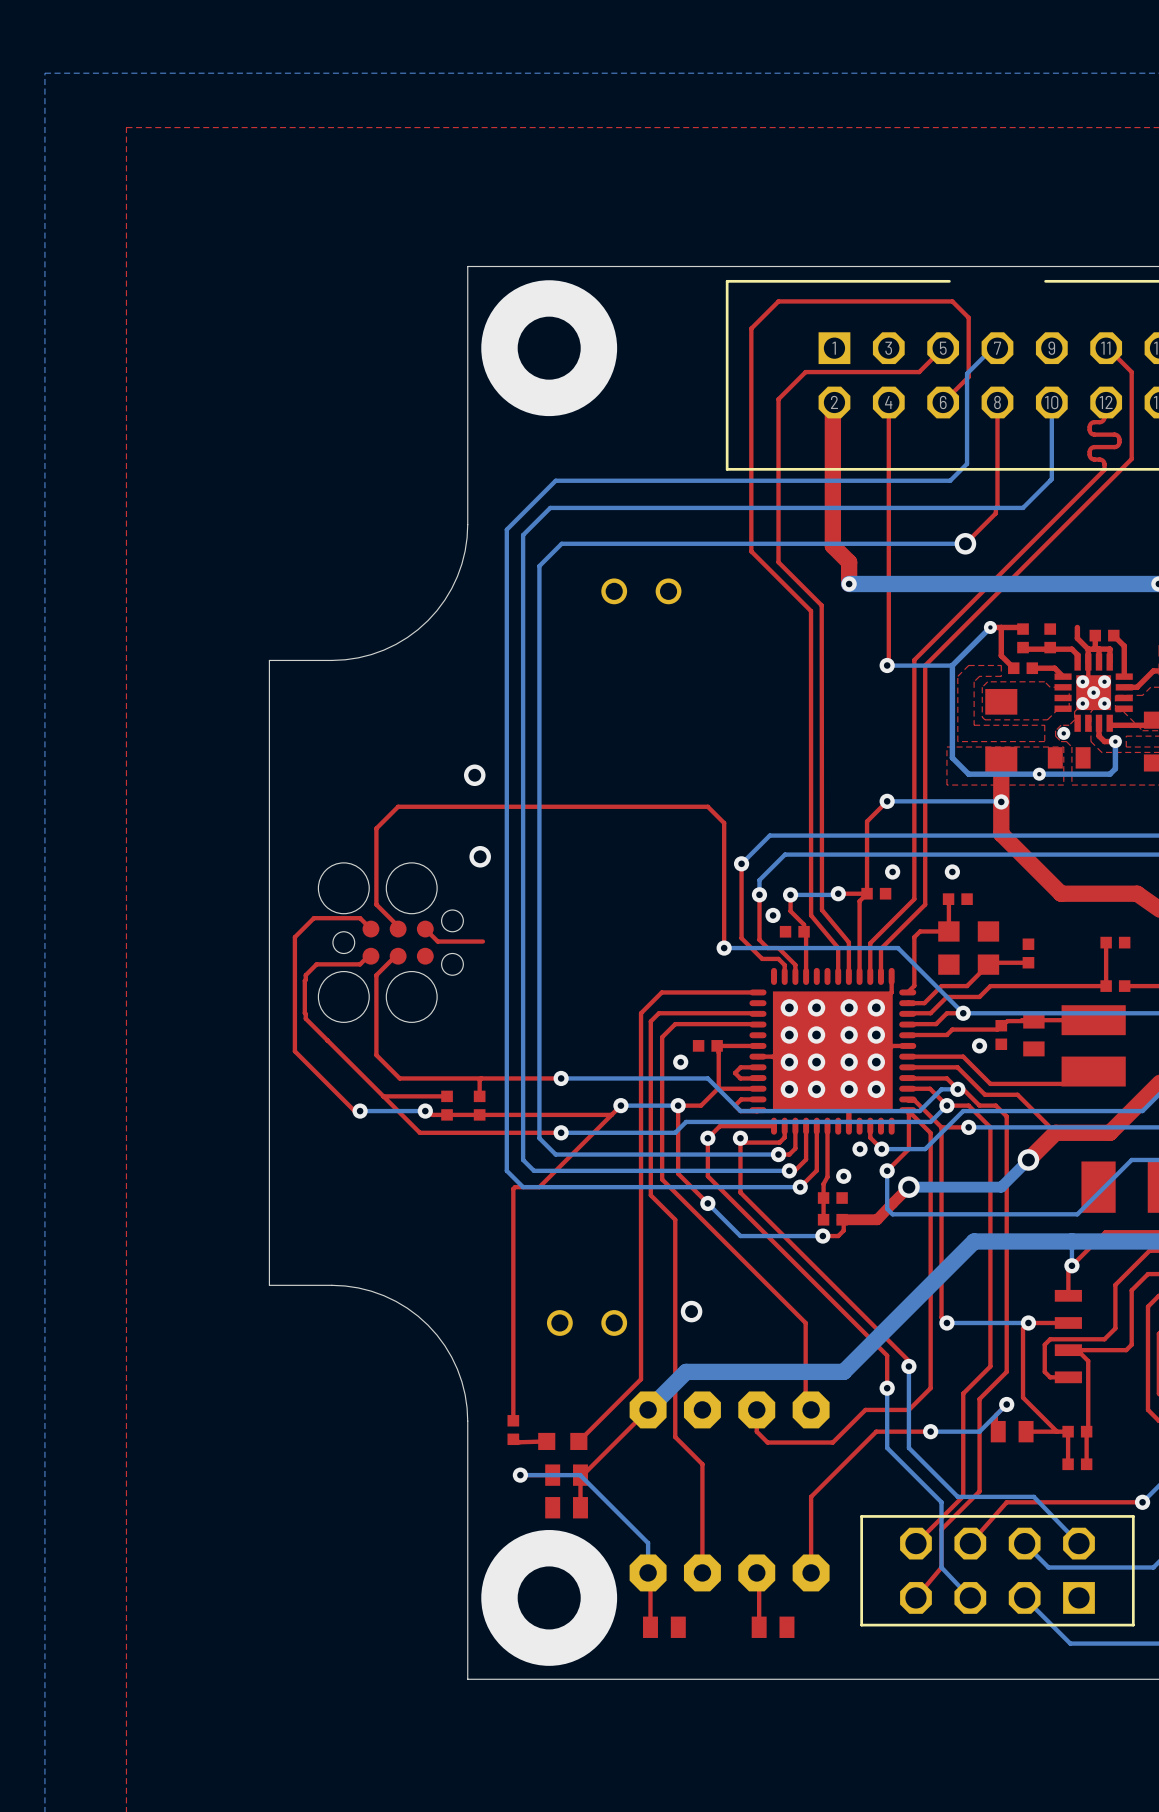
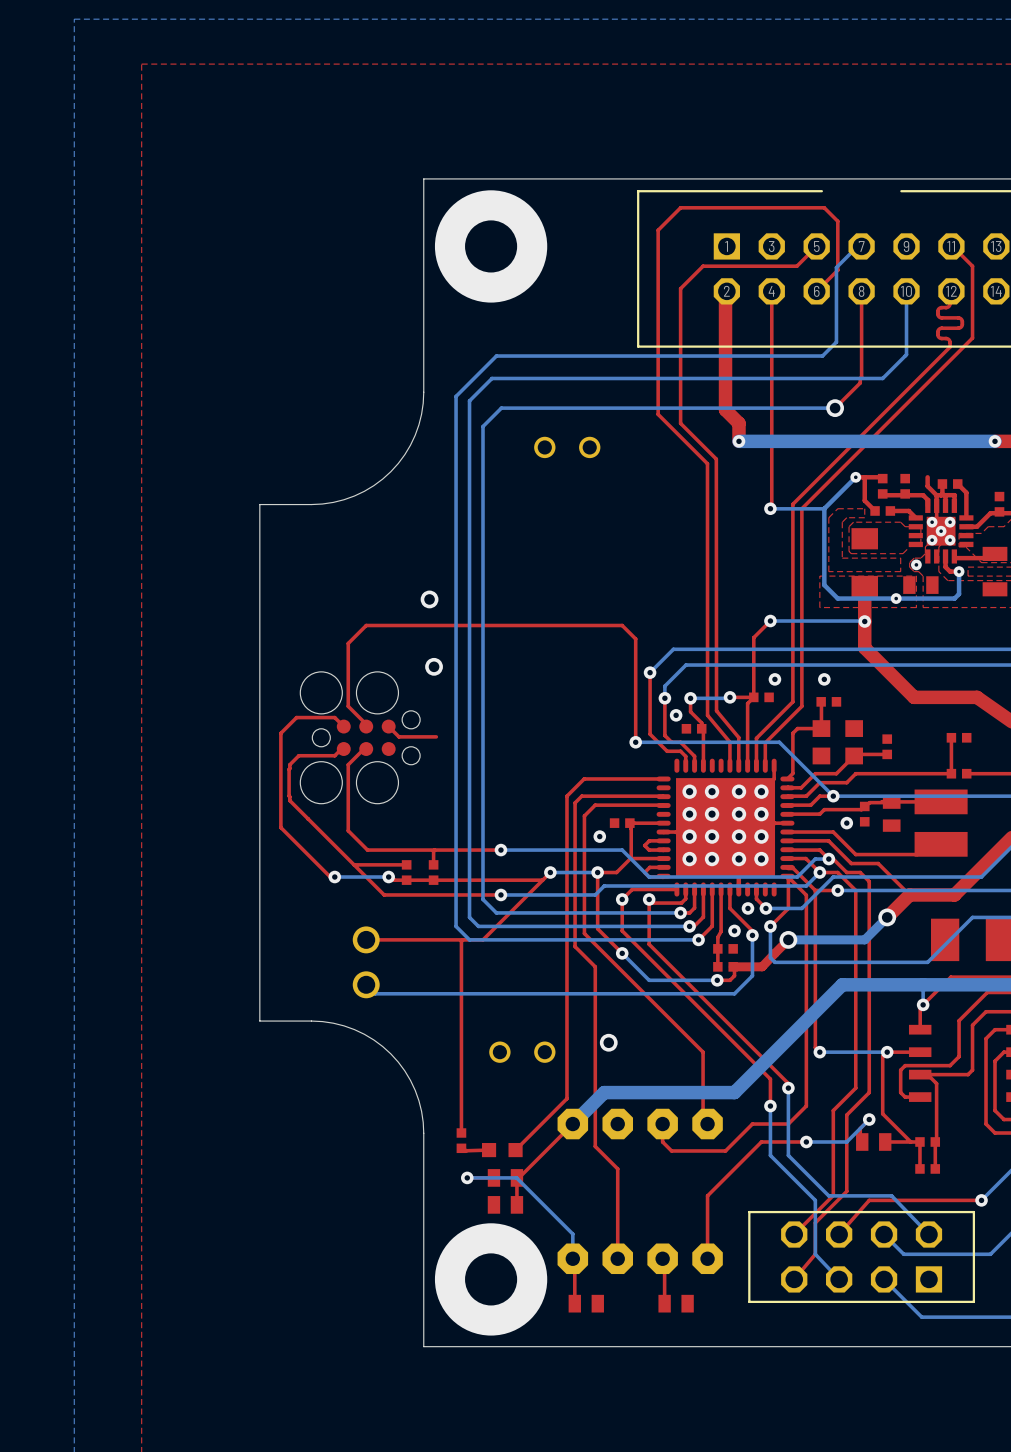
top track: none -> (729, 889) (729, 908) (752, 930) (752, 935)
bottom track: none -> (752, 935) (752, 975) (734, 993) (375, 993) (366, 984)
via: none -> (752, 935)
top track: none -> (462, 939) (366, 939)
part: none -> (366, 962)

